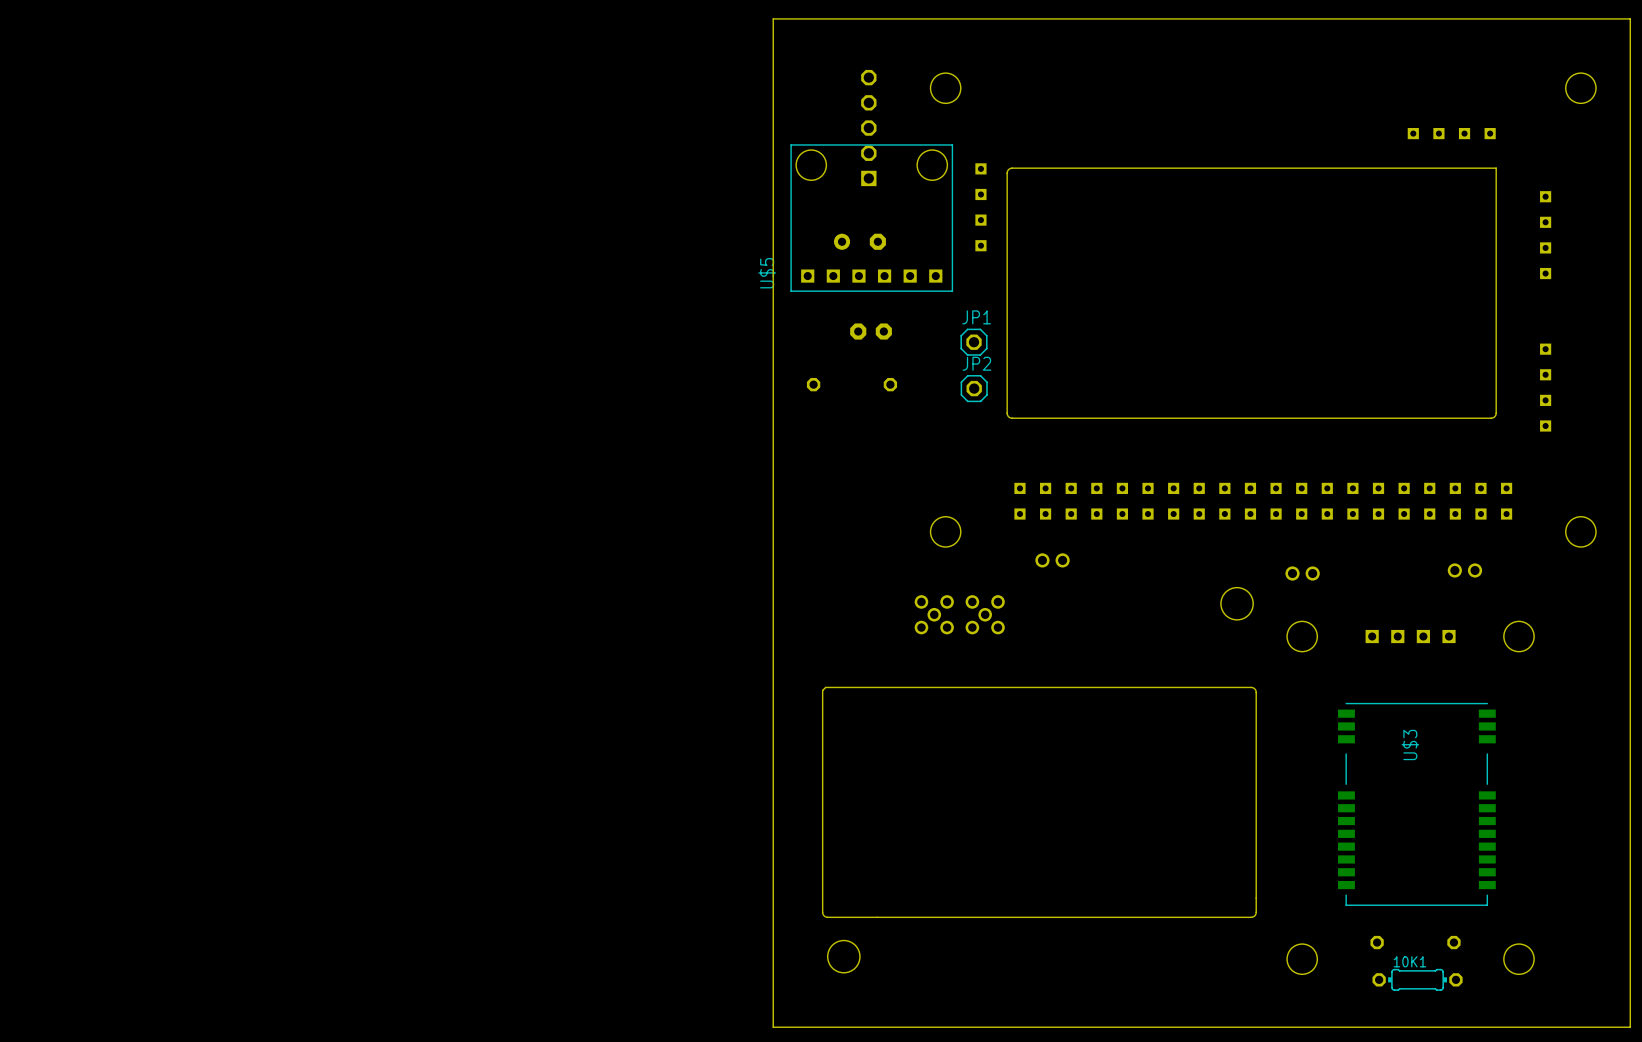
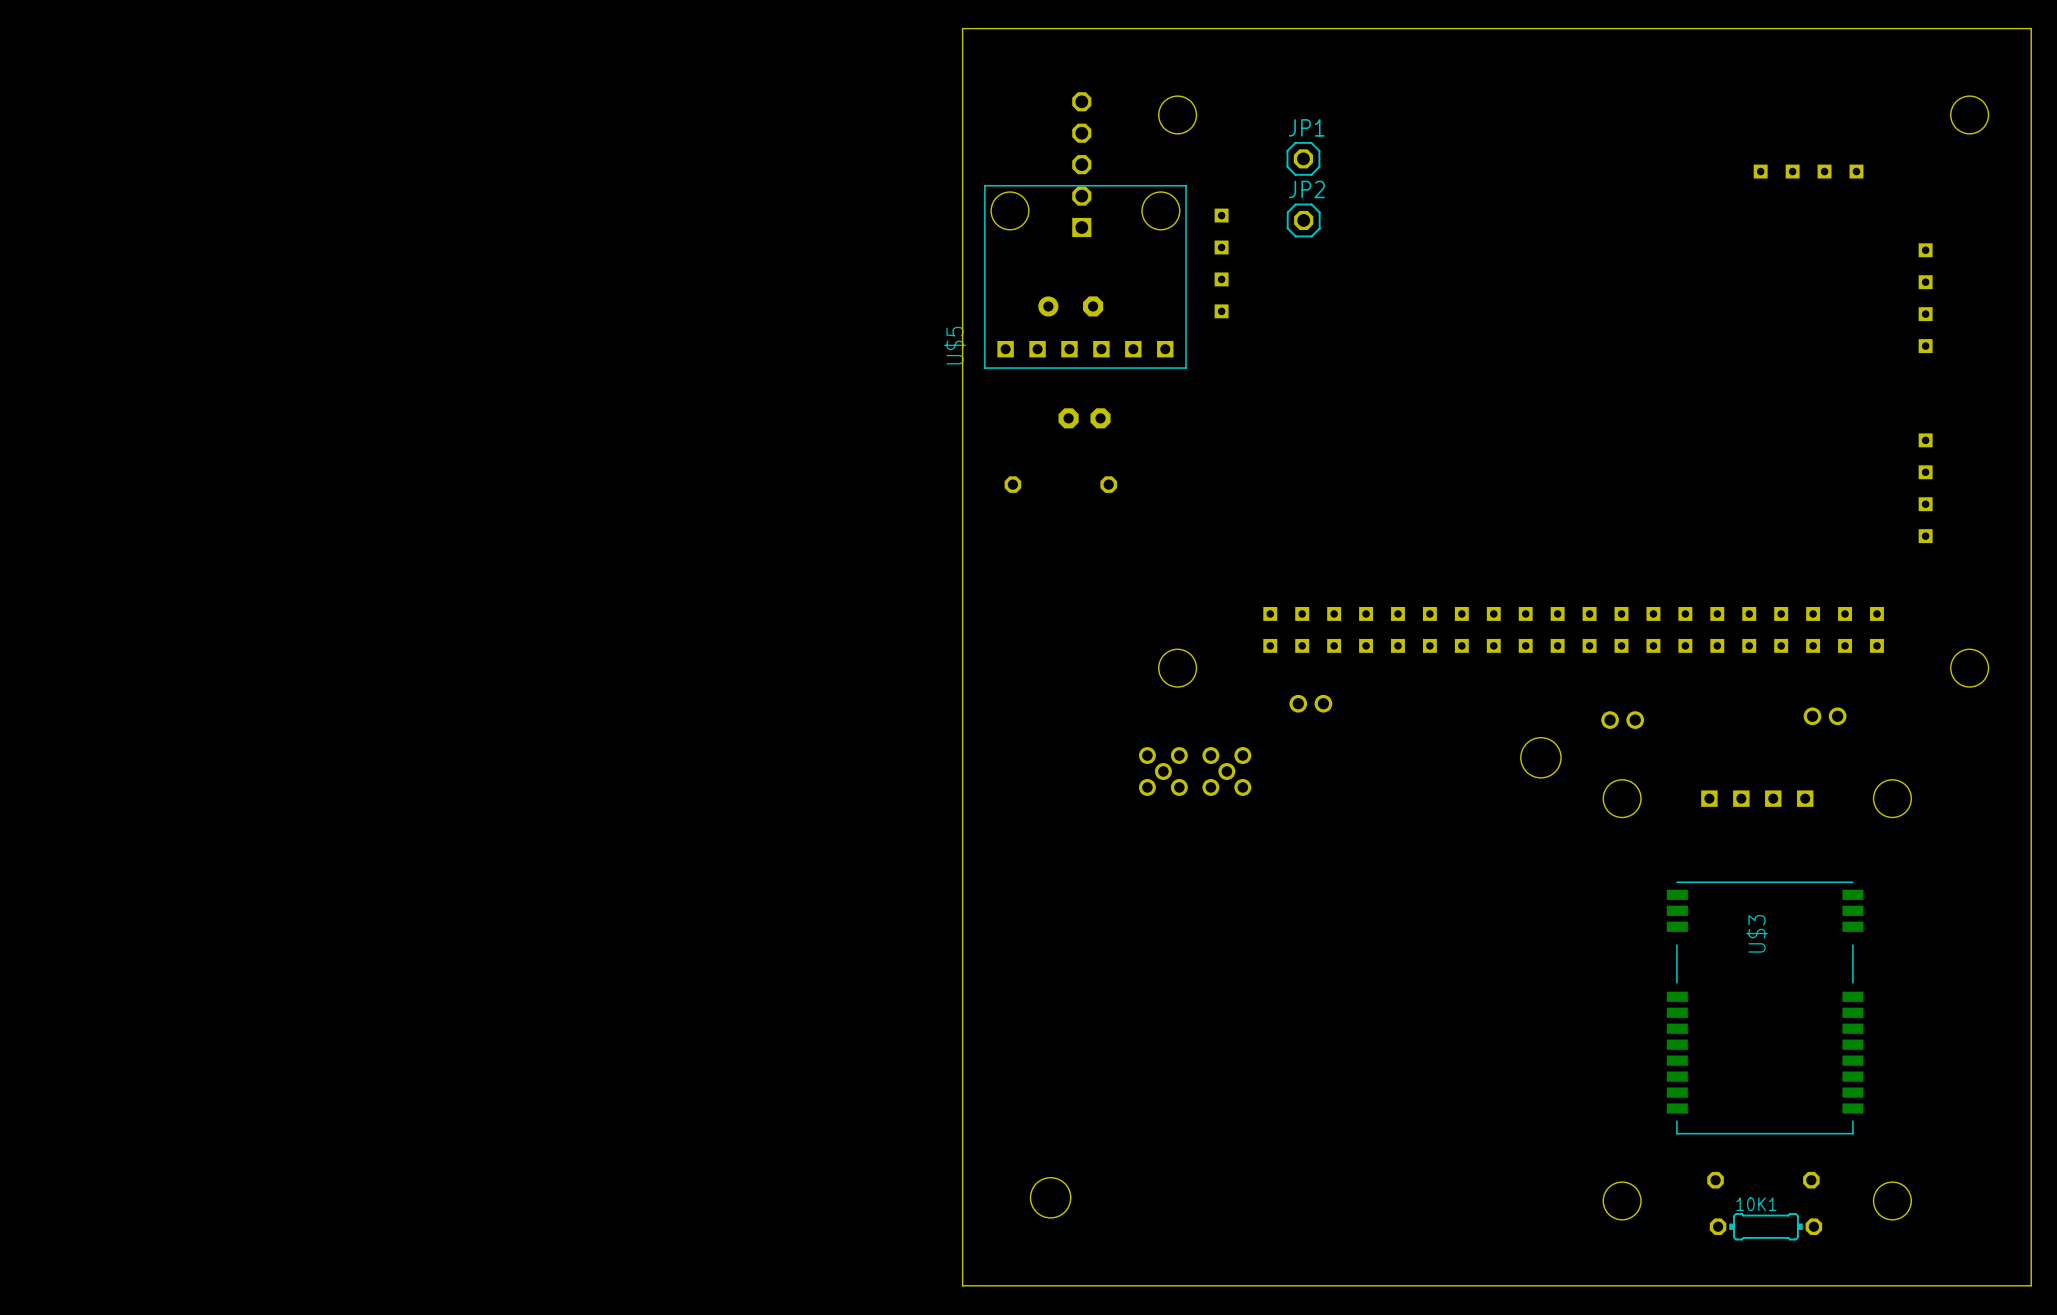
board edge: (1496, 168) (1009, 168) (1007, 173) (1007, 415) (1012, 418) (1493, 417) (1496, 413) (1496, 168) -> none
JP1 position: (974, 342) -> (1303, 158)
JP2 position: (974, 388) -> (1303, 220)
board edge: (1251, 687) (825, 687) (822, 690) (823, 914) (827, 917) (1253, 916) (1256, 912) (1256, 692) (1251, 687) -> none

